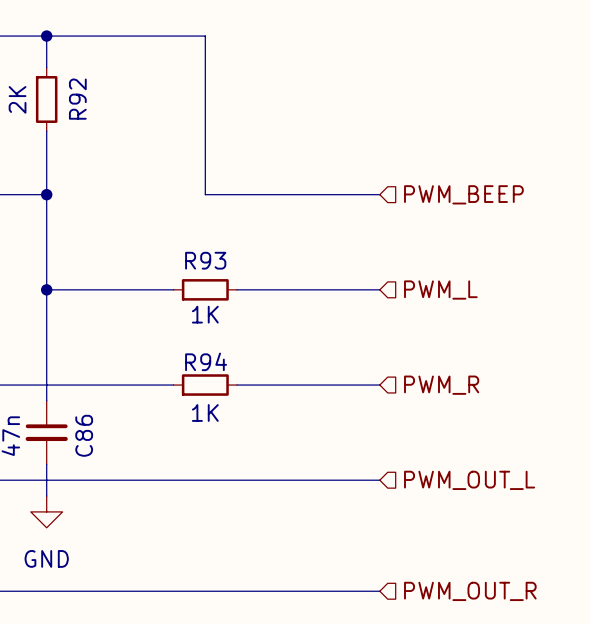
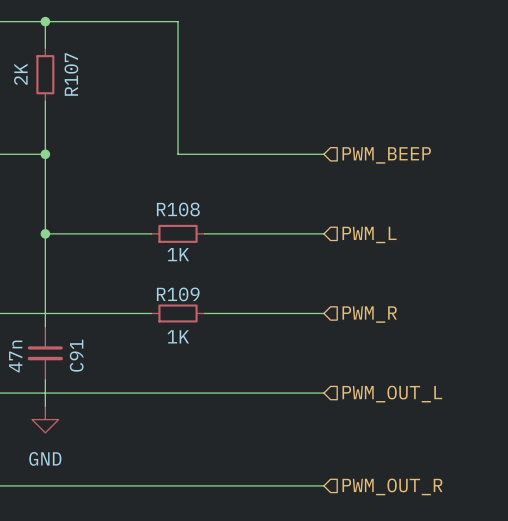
R92 name: R92 (77, 99) -> R107 (71, 74)
R93 name: R93 (205, 260) -> R108 (178, 209)
R94 name: R94 (206, 361) -> R109 (178, 294)
C86 name: C86 (84, 435) -> C91 (76, 355)

